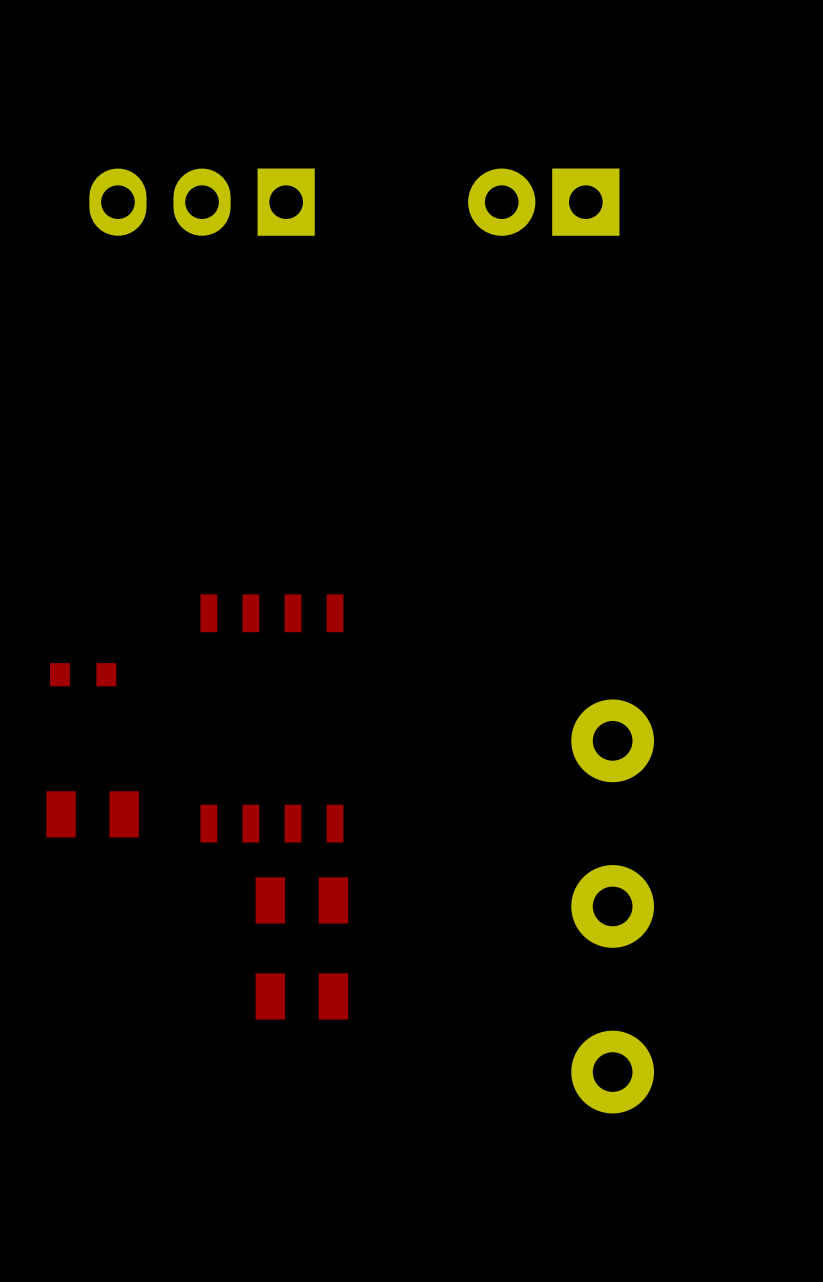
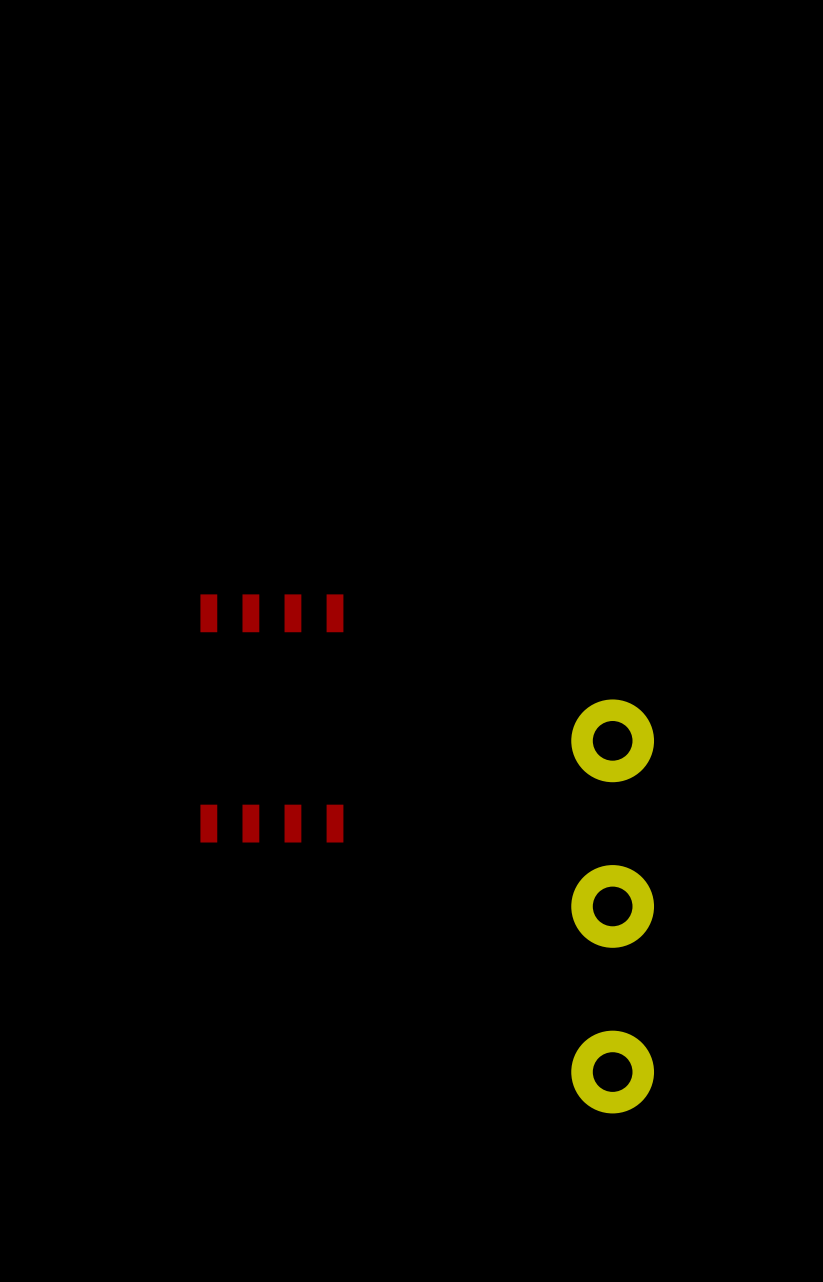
part: (202, 202) -> none
part: (543, 202) -> none
part: (83, 674) -> none
part: (92, 814) -> none
part: (301, 900) -> none
part: (301, 996) -> none

